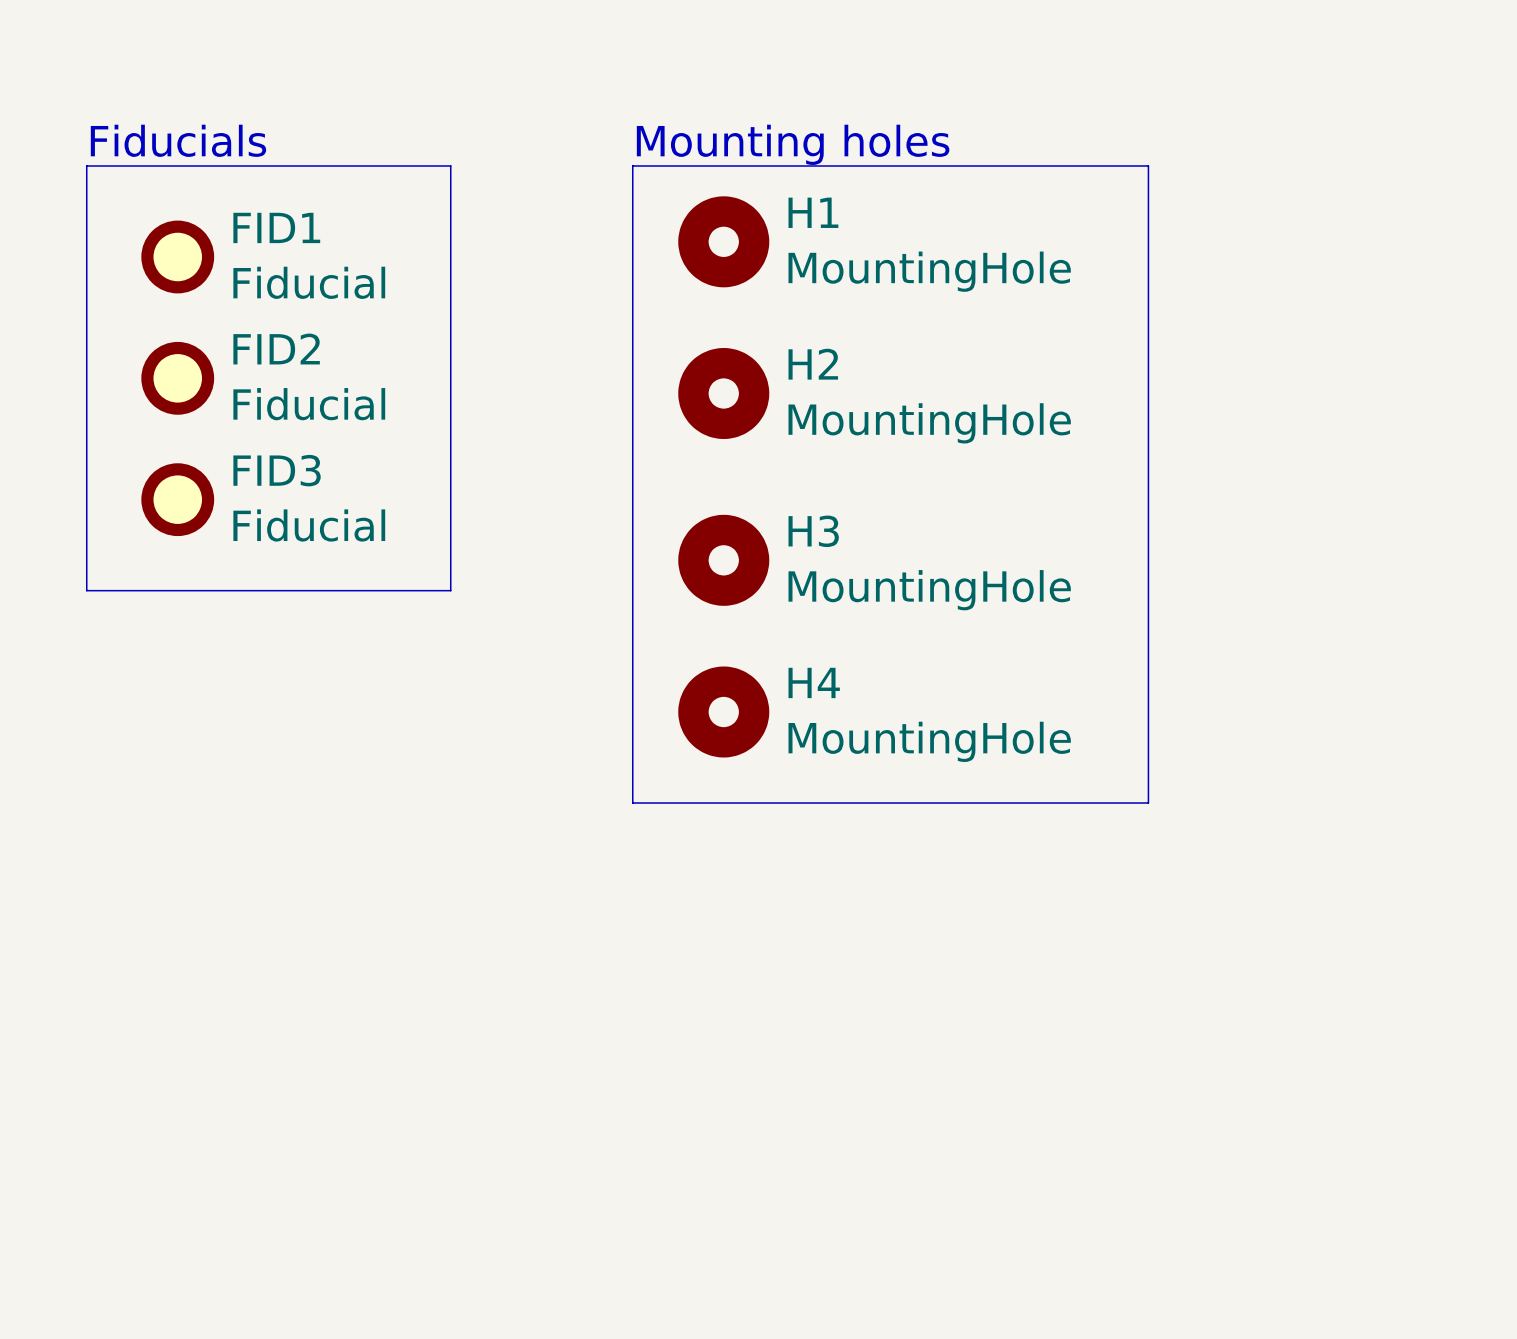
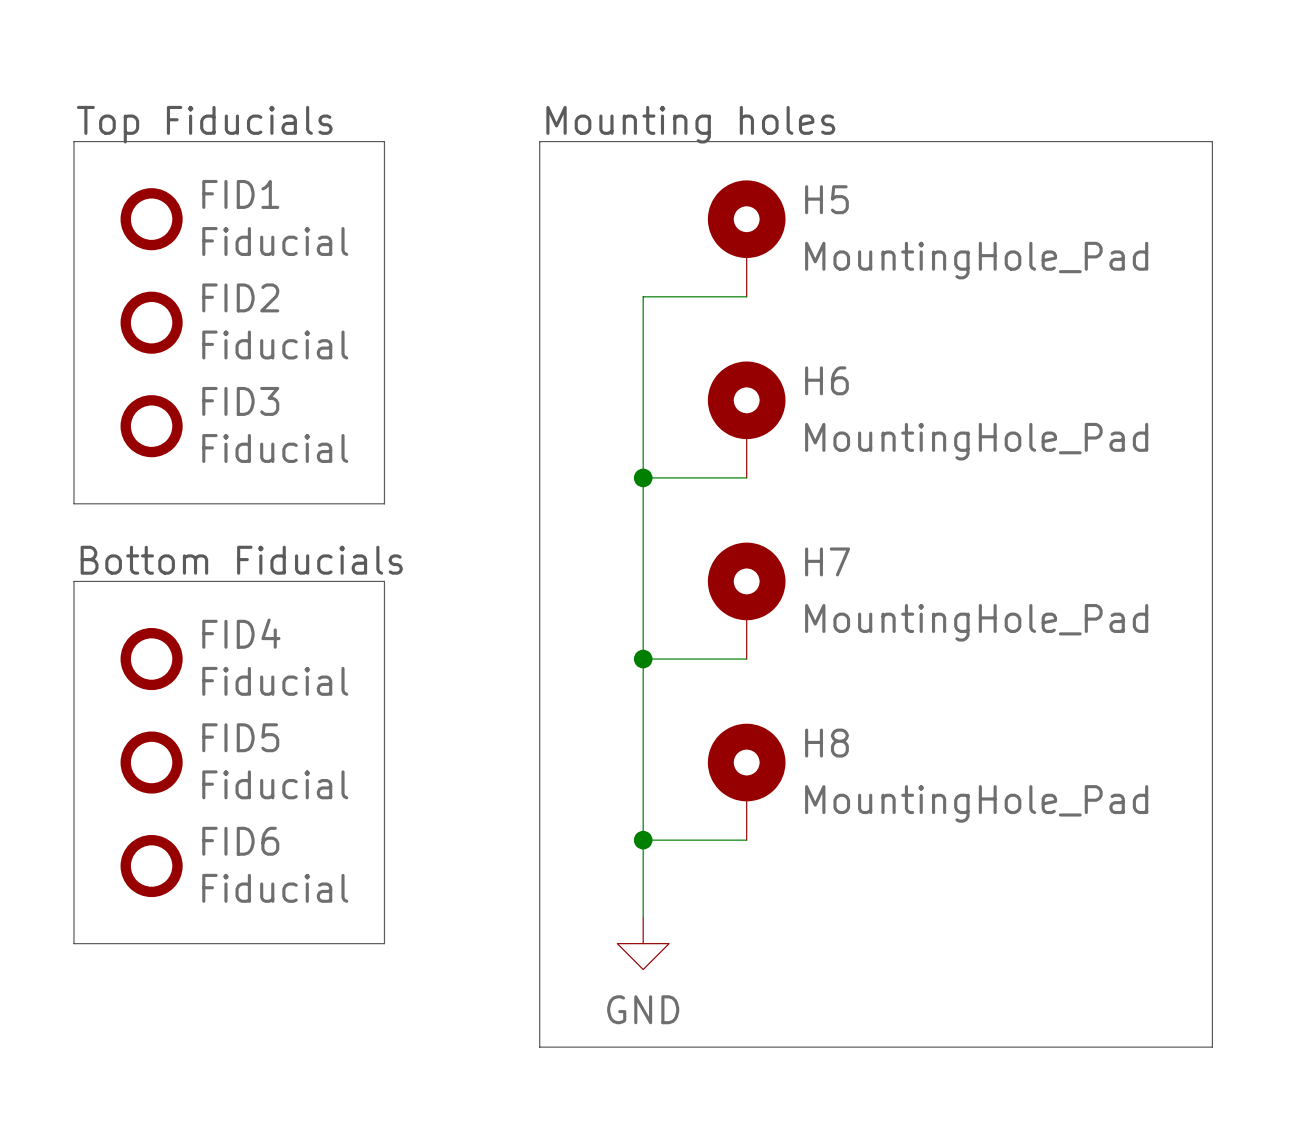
text: Fiducials (178, 140) -> Top Fiducials (204, 124)
line: (1148, 165) (1148, 803) (632, 803) -> (979, 141) (1212, 141) (1212, 1047) (539, 1047) (539, 684)
H1: MountingHole (723, 241) -> none
H5: none -> MountingHole_Pad (746, 238)
wire: none -> (746, 296) (643, 296) (643, 917)
H2: MountingHole (723, 393) -> none
H6: none -> MountingHole_Pad (746, 419)
H3: MountingHole (723, 560) -> none
wire: none -> (643, 477) (746, 477)
junction: none -> (643, 477)
text: none -> Bottom Fiducials (241, 560)
line: none -> (73, 581) (384, 581) (384, 943) (73, 943) (73, 581)
H7: none -> MountingHole_Pad (746, 600)
H4: MountingHole (723, 712) -> none
FID4: none -> Fiducial (151, 659)
wire: none -> (643, 659) (746, 659)
junction: none -> (643, 659)
FID5: none -> Fiducial (151, 762)
H8: none -> MountingHole_Pad (746, 781)
wire: none -> (643, 840) (746, 840)
junction: none -> (643, 840)
FID6: none -> Fiducial (151, 866)
power symbol: none -> GND (643, 943)

